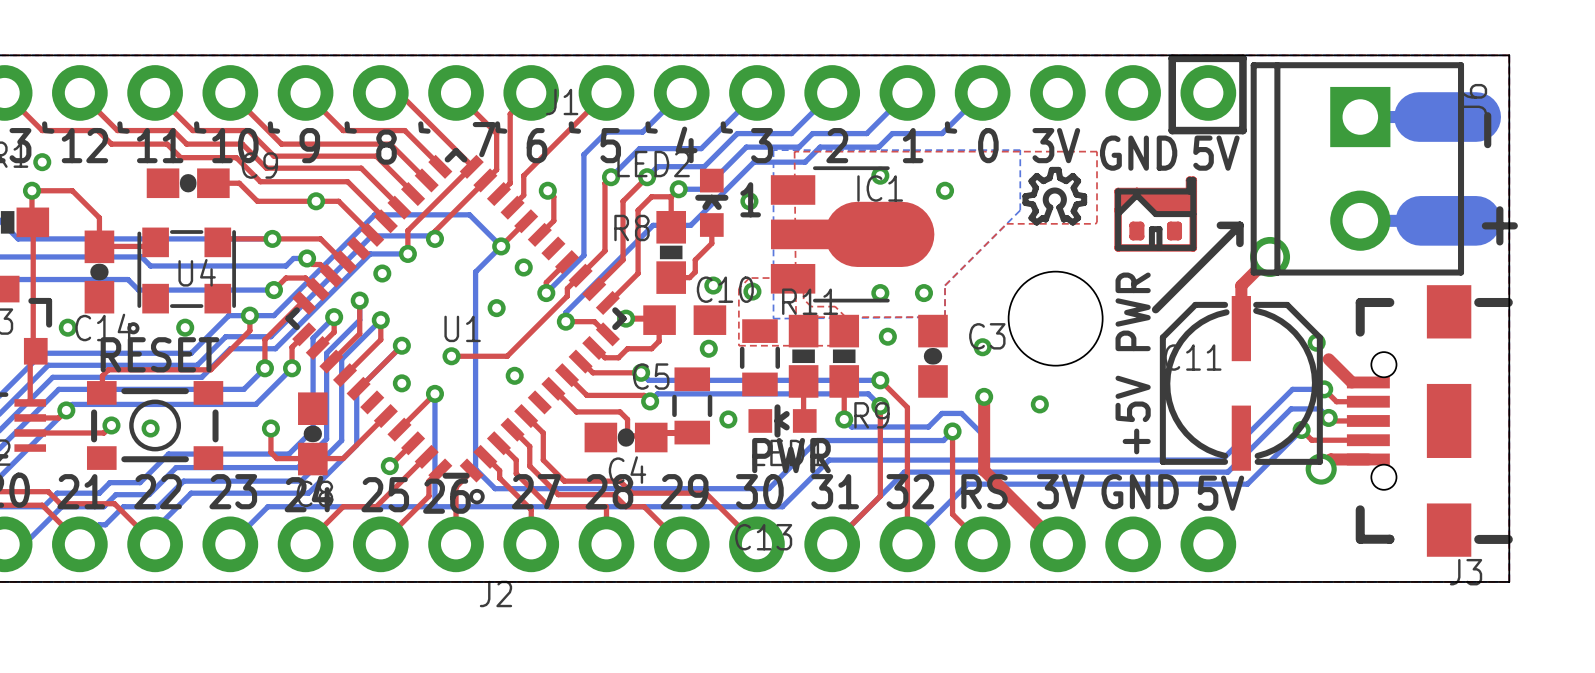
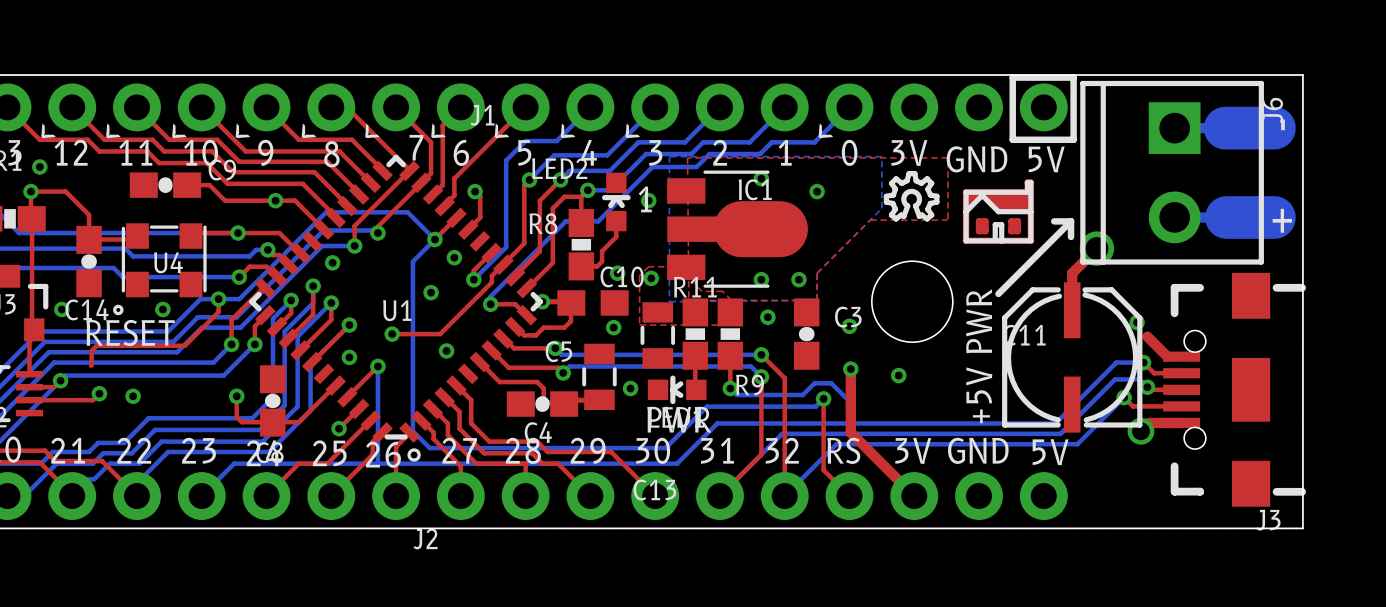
part: (155, 425) -> none

